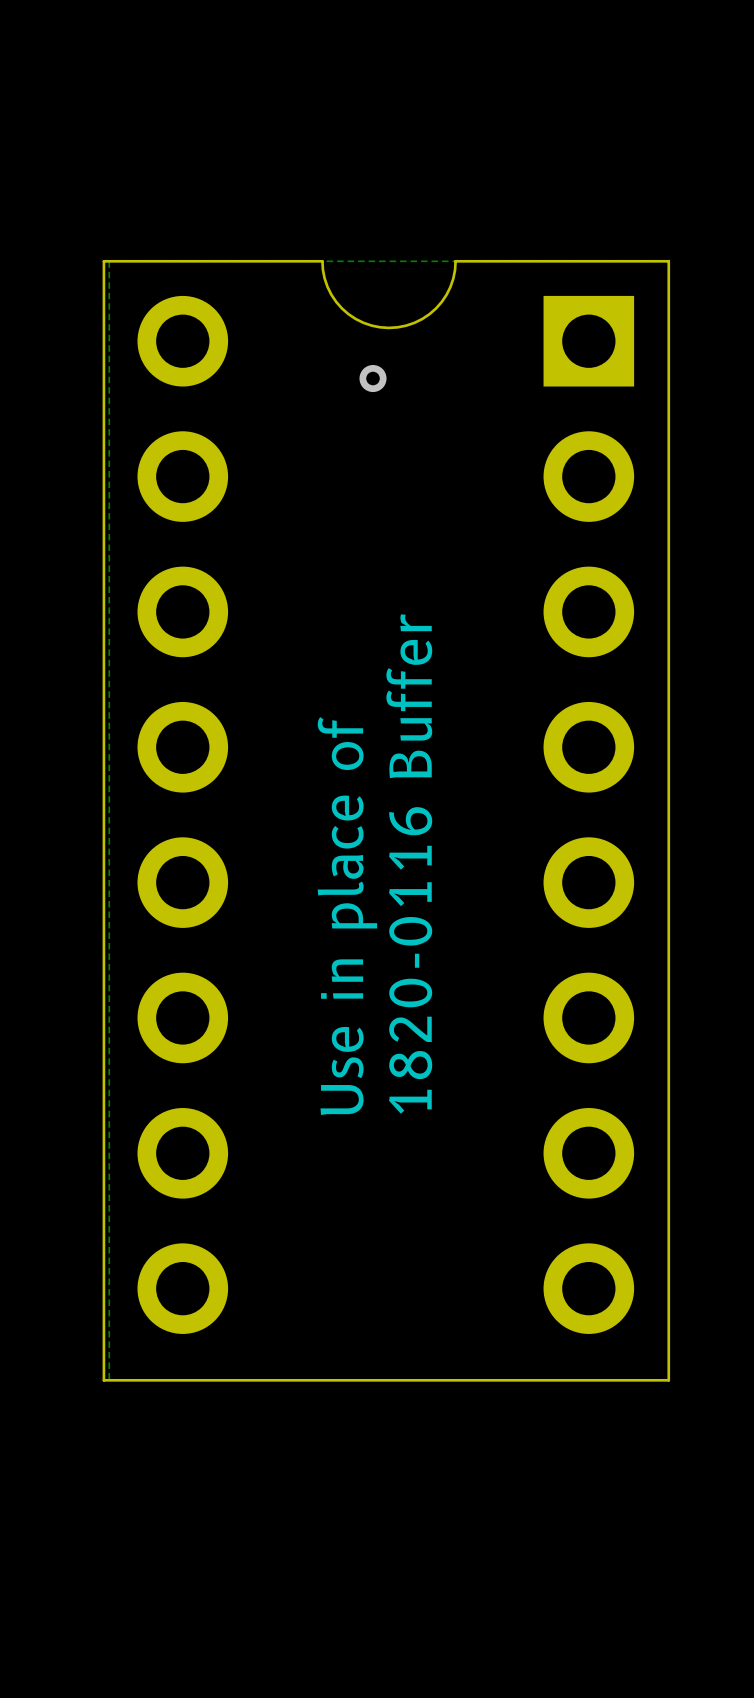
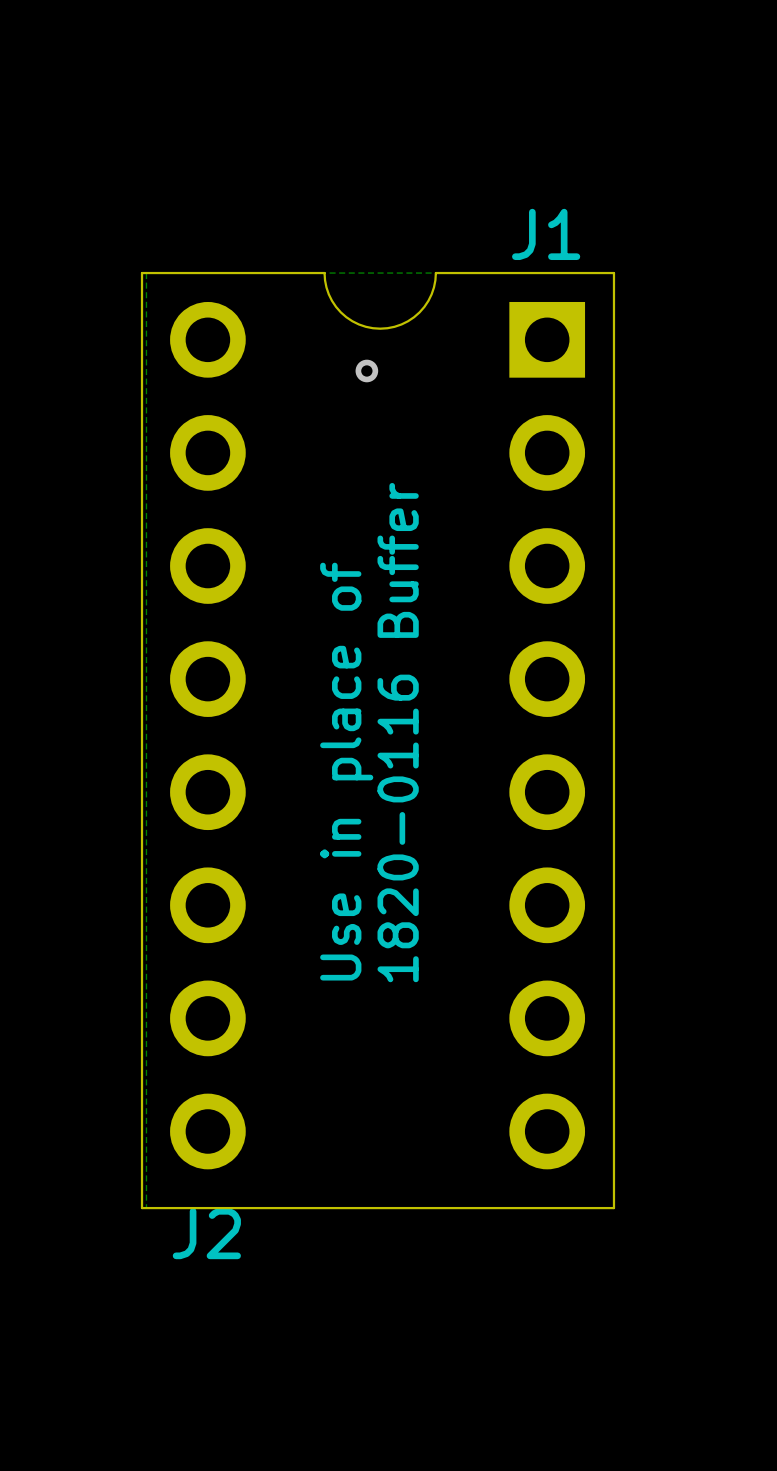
J1 name: none -> J1 (546, 234)
J2 name: none -> J2 (206, 1233)

